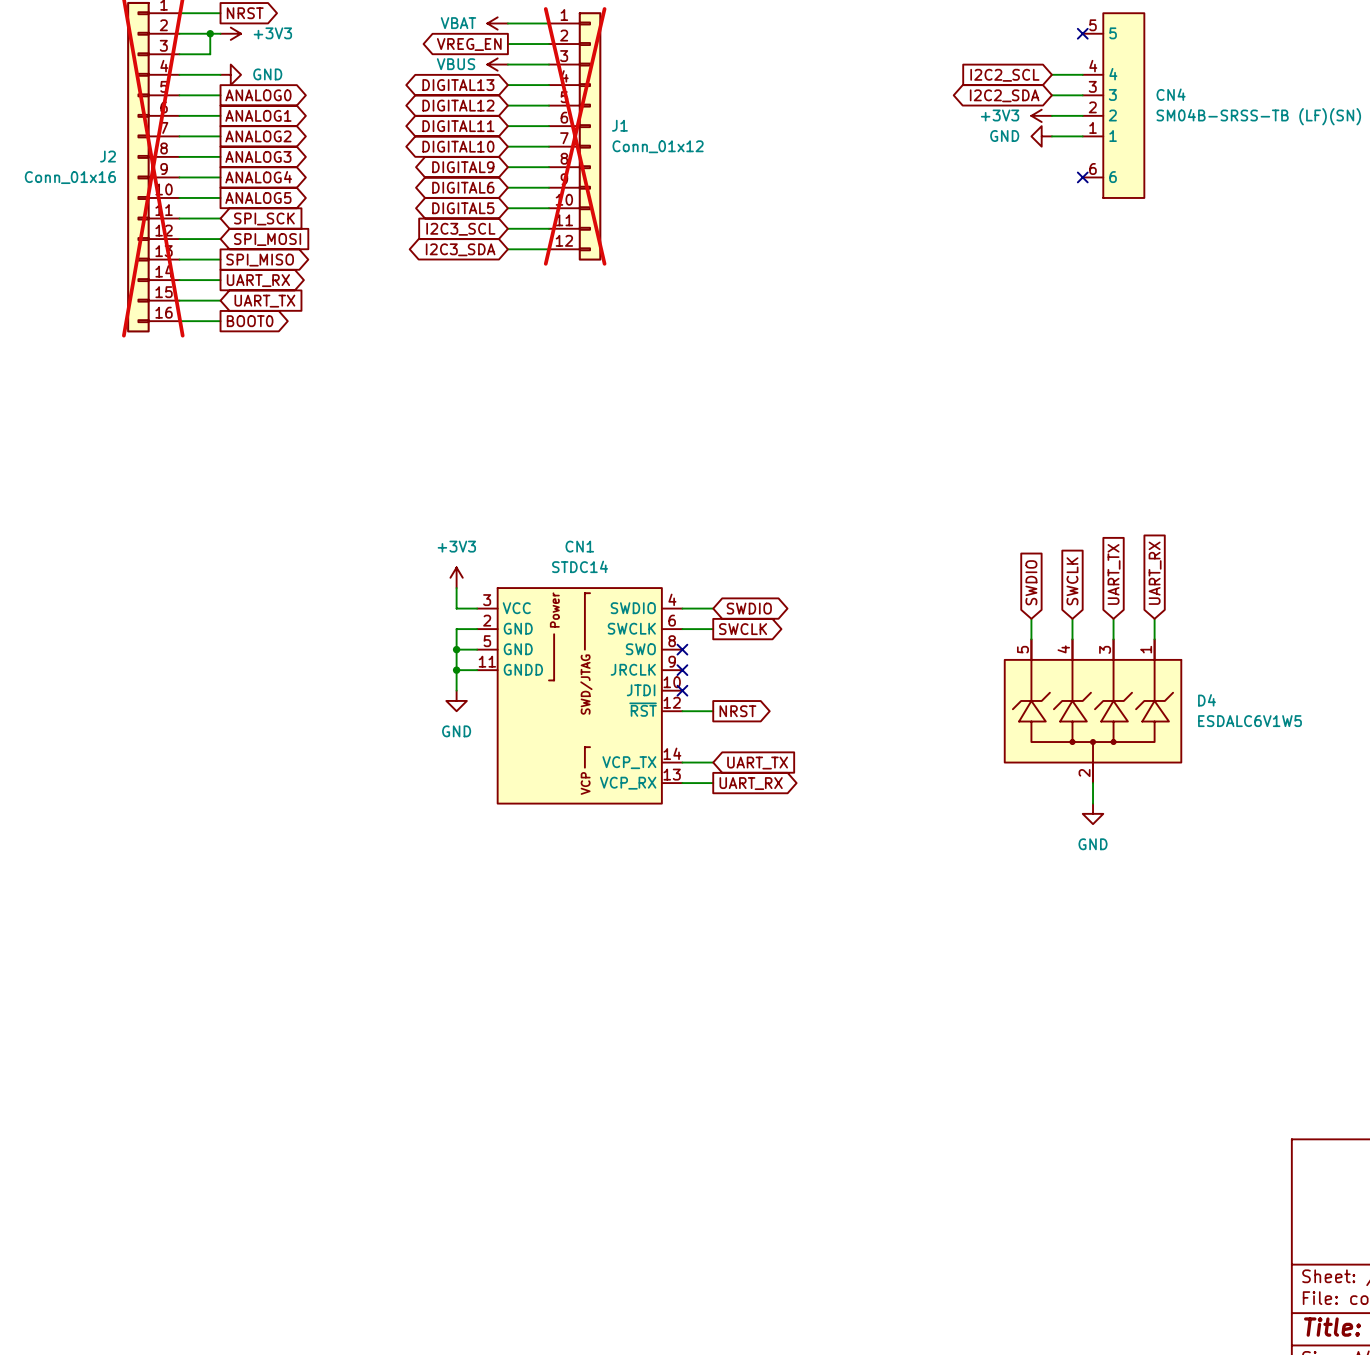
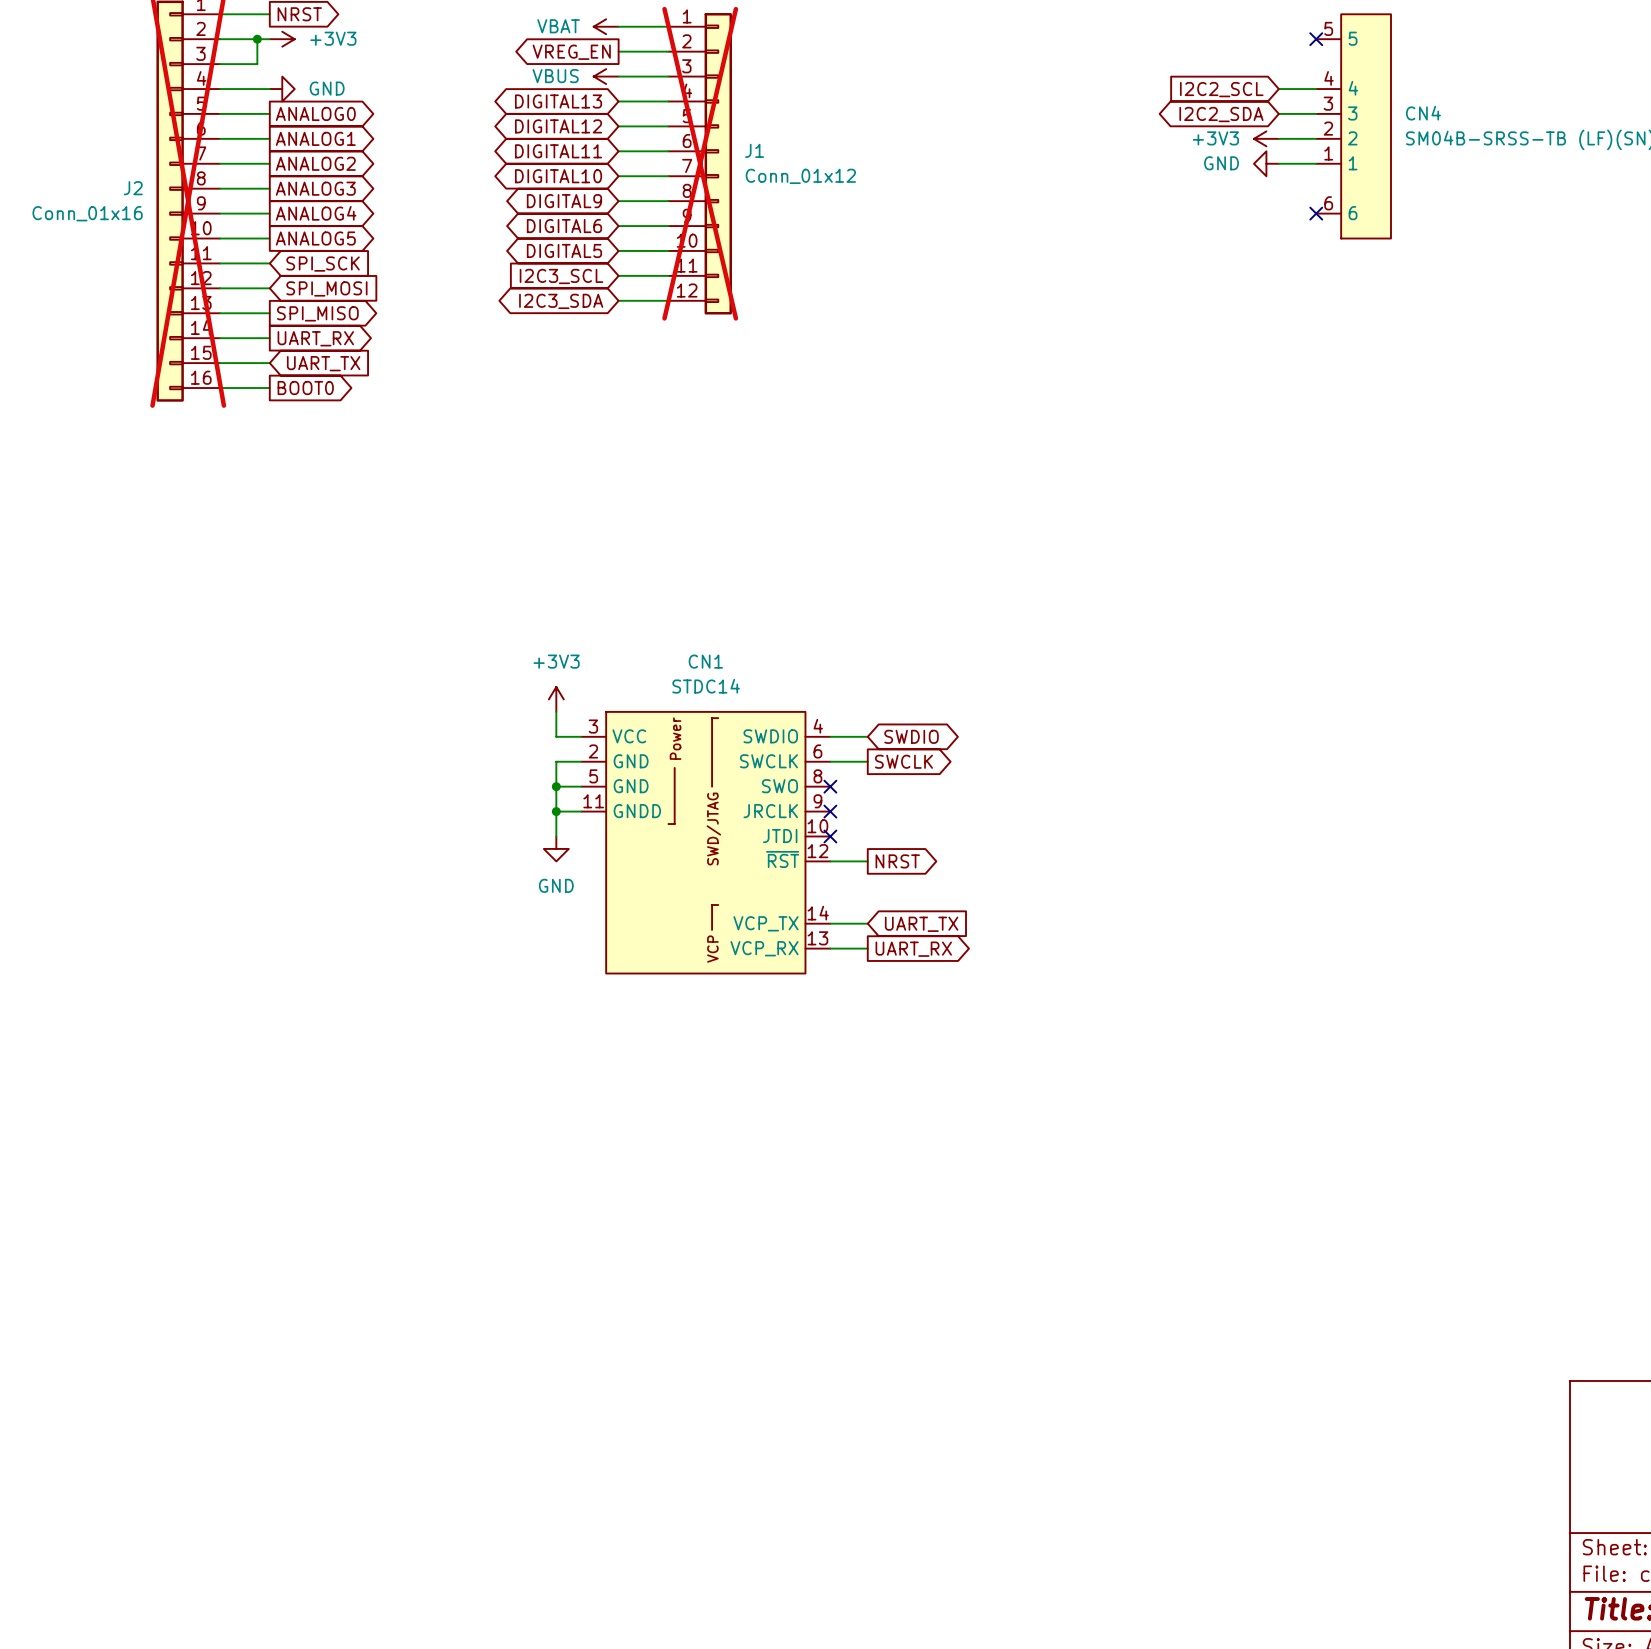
global label: UART_RX (1155, 573) -> none
global label: UART_TX (1114, 574) -> none
global label: SWCLK (1072, 581) -> none
global label: SWDIO (1031, 582) -> none
wire: (1031, 618) (1031, 639) -> none
wire: (1072, 618) (1072, 639) -> none
wire: (1113, 618) (1113, 639) -> none
wire: (1154, 618) (1154, 639) -> none
D4: ESDALC6V1W5 (1093, 711) -> none
wire: (1093, 783) (1093, 803) -> none
power symbol: GND (1093, 813) -> none

